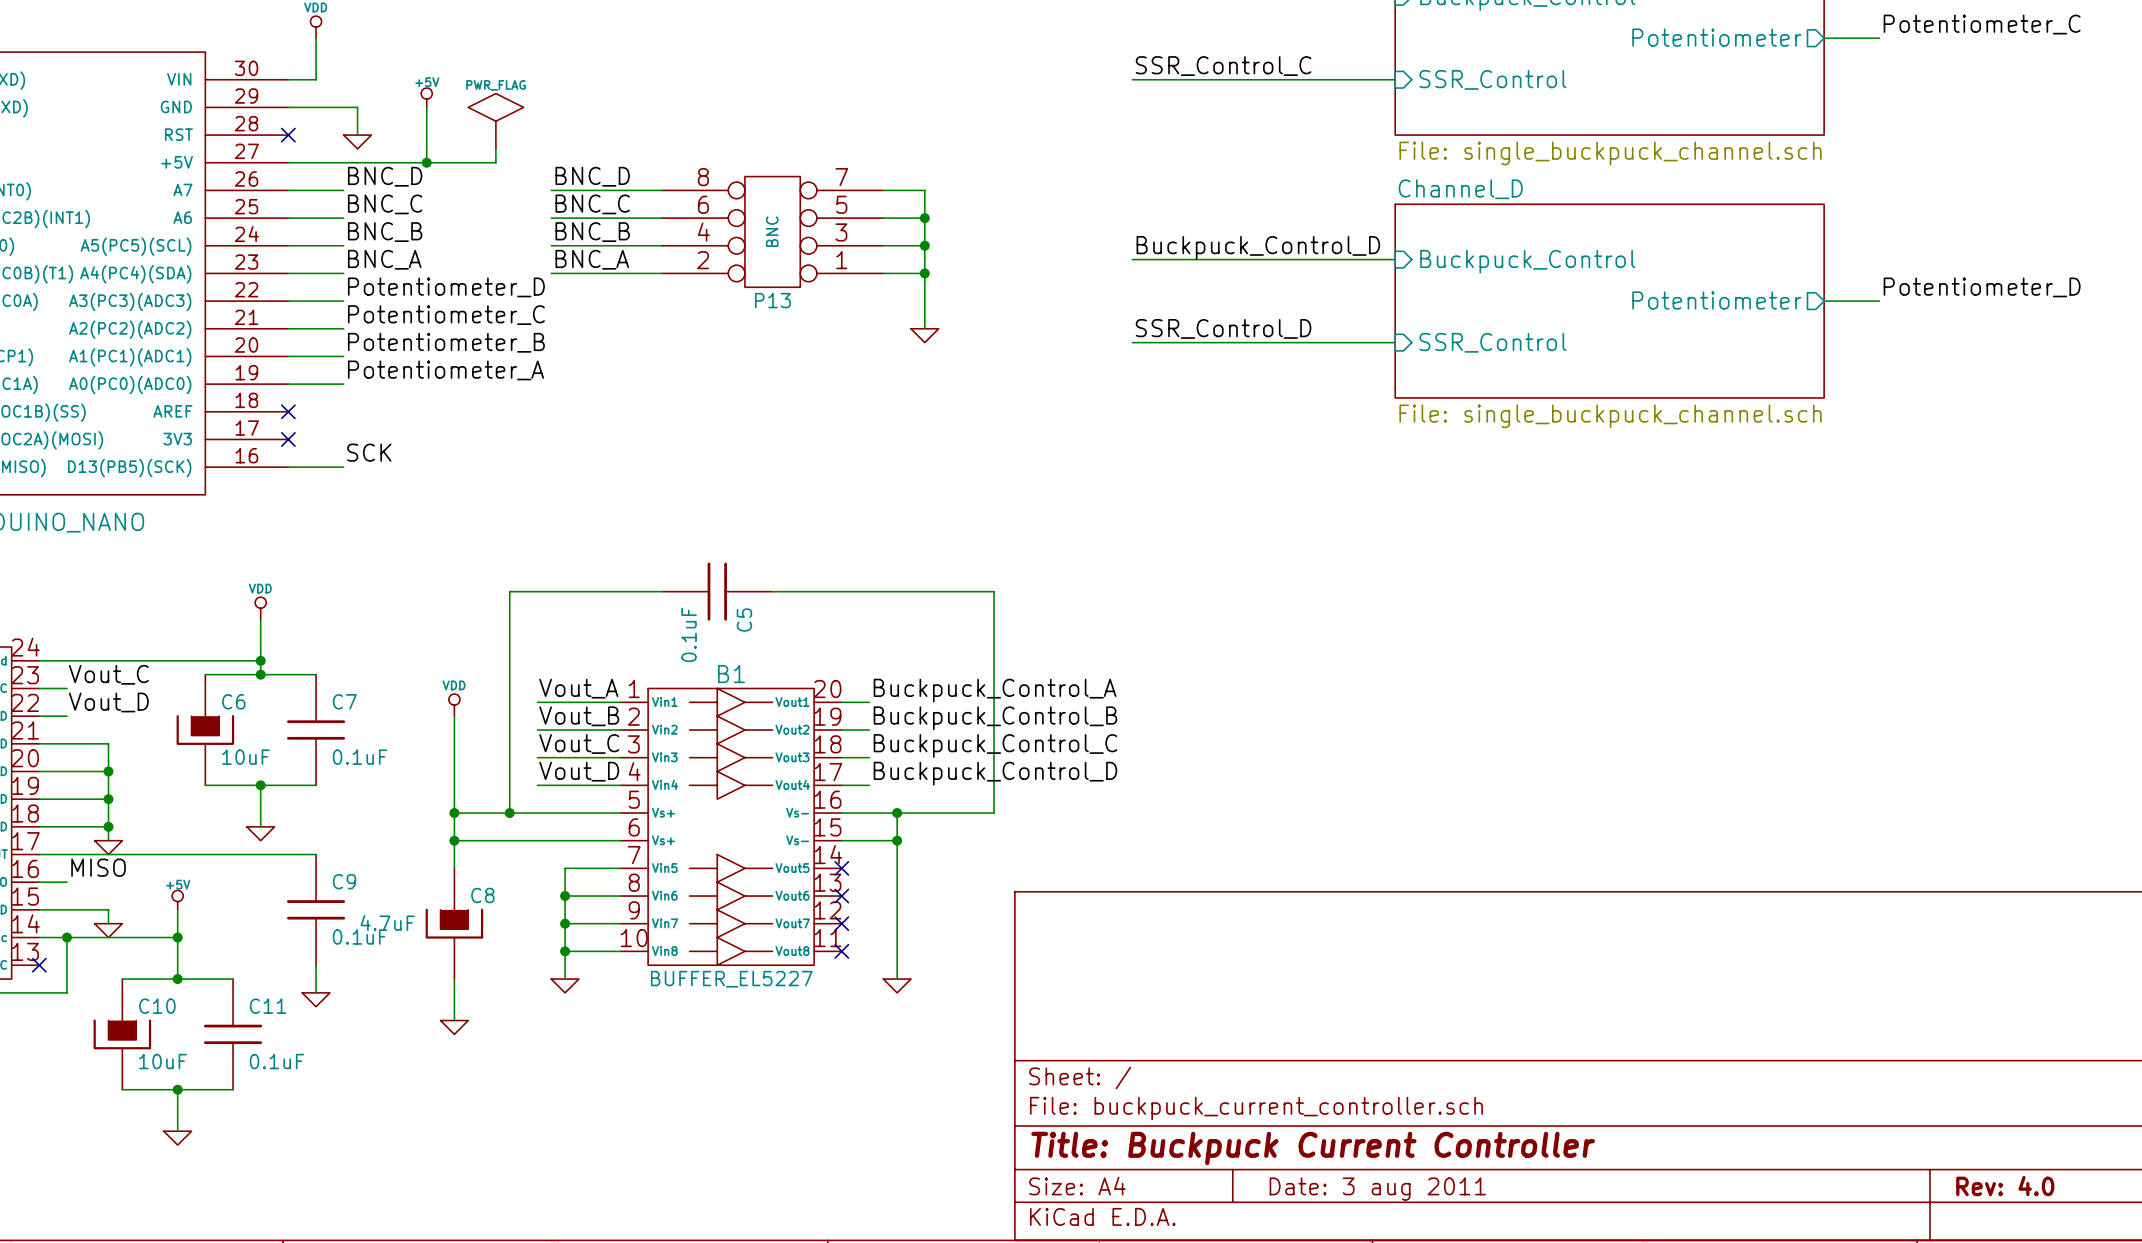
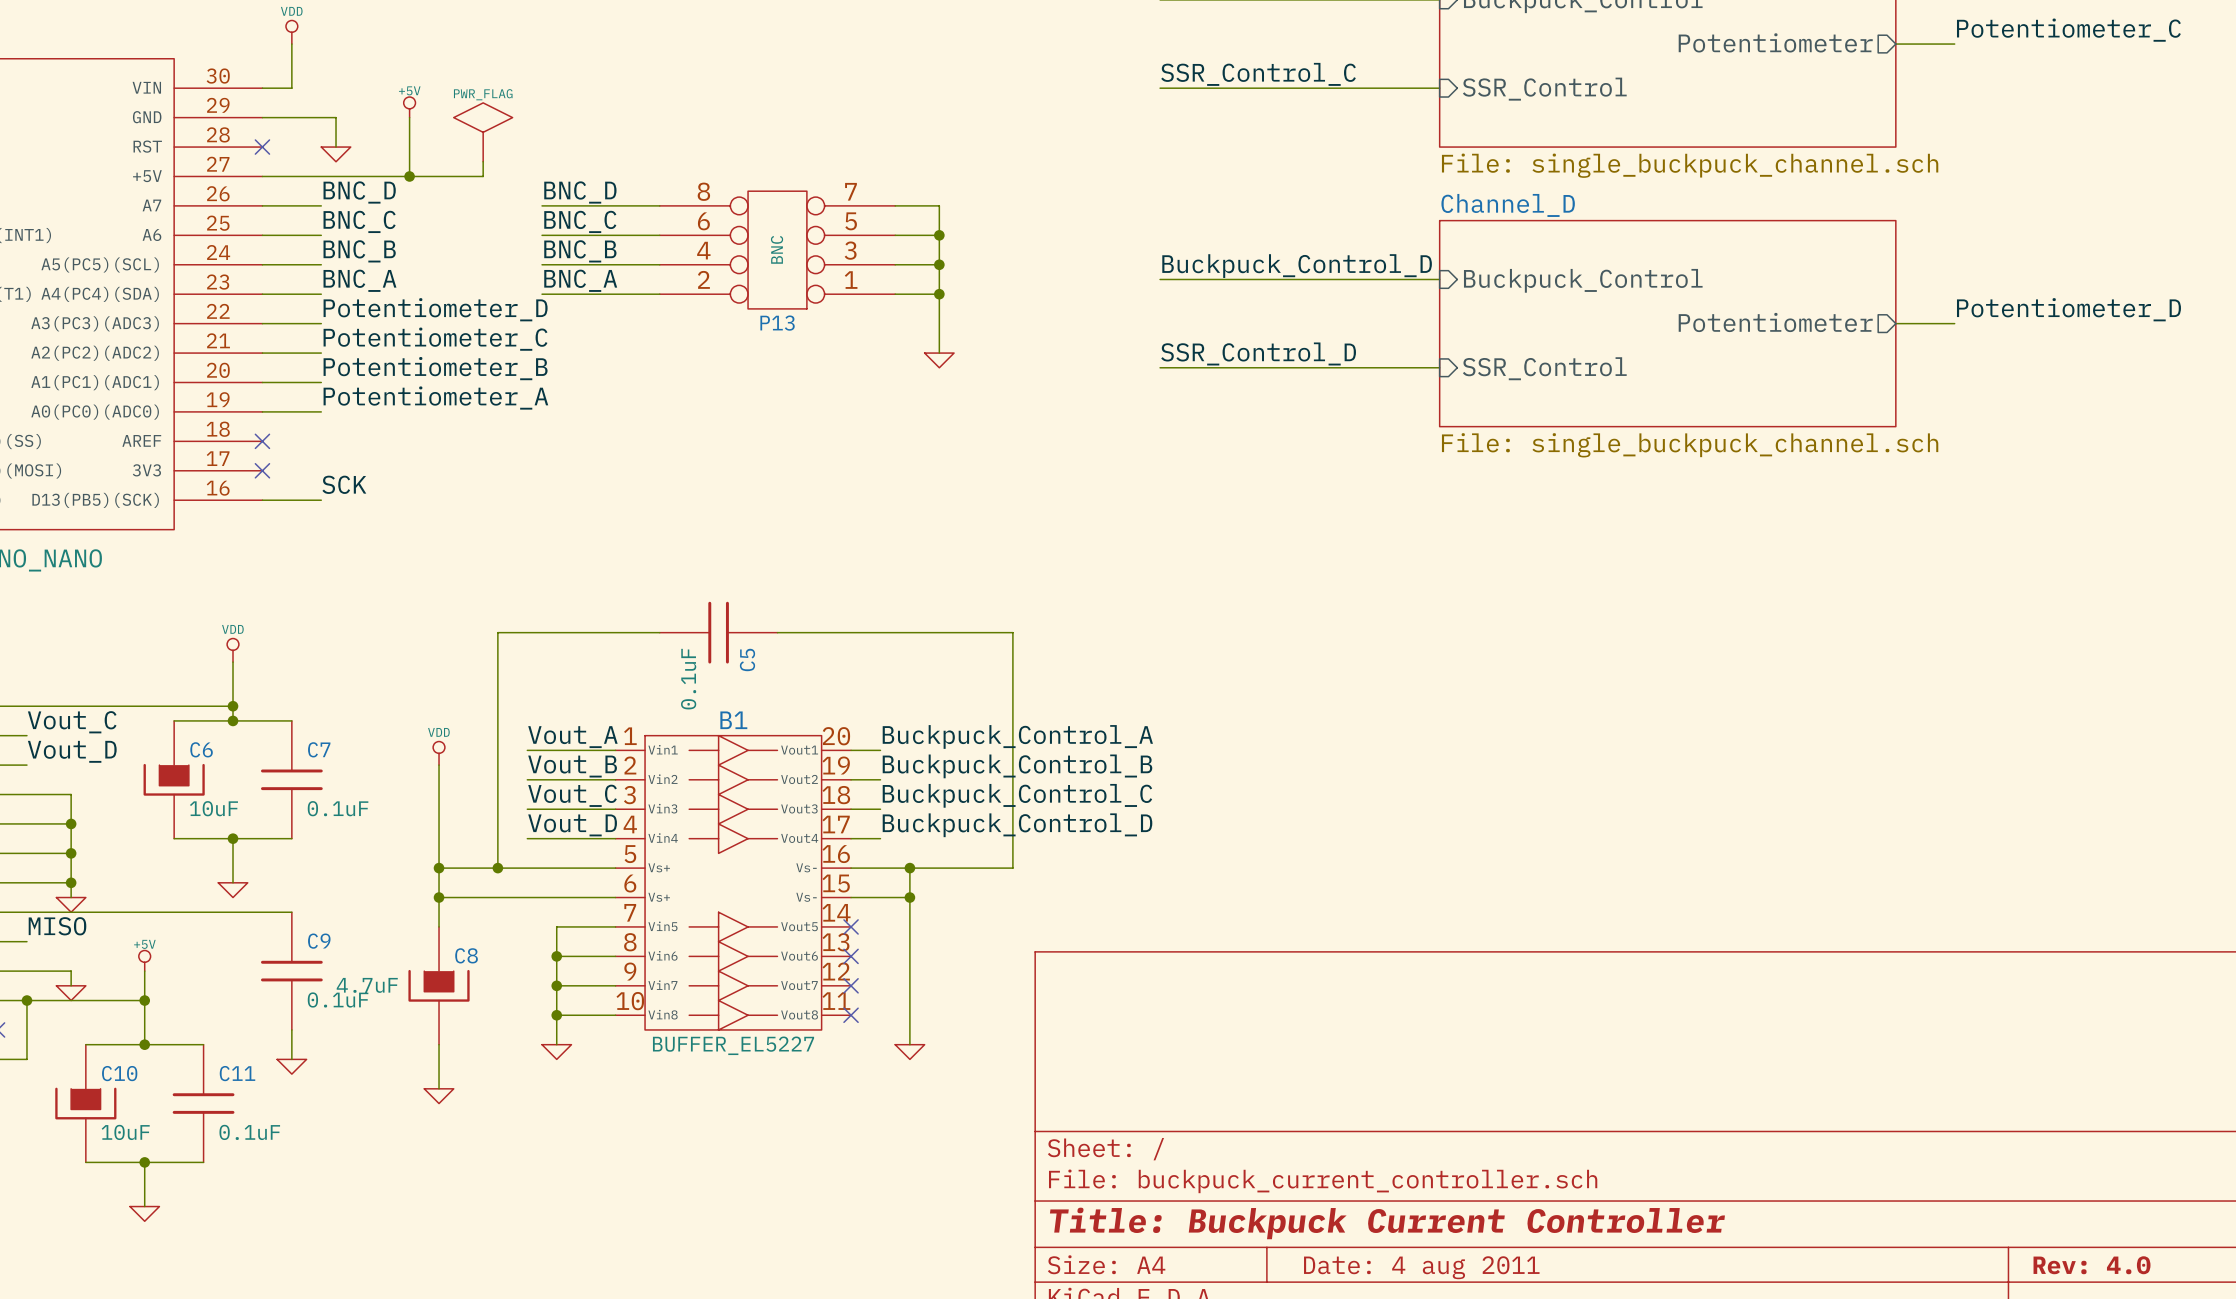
title block: Date: 3 aug 2011 (1377, 1189) -> Date: 4 aug 2011 (1421, 1267)

